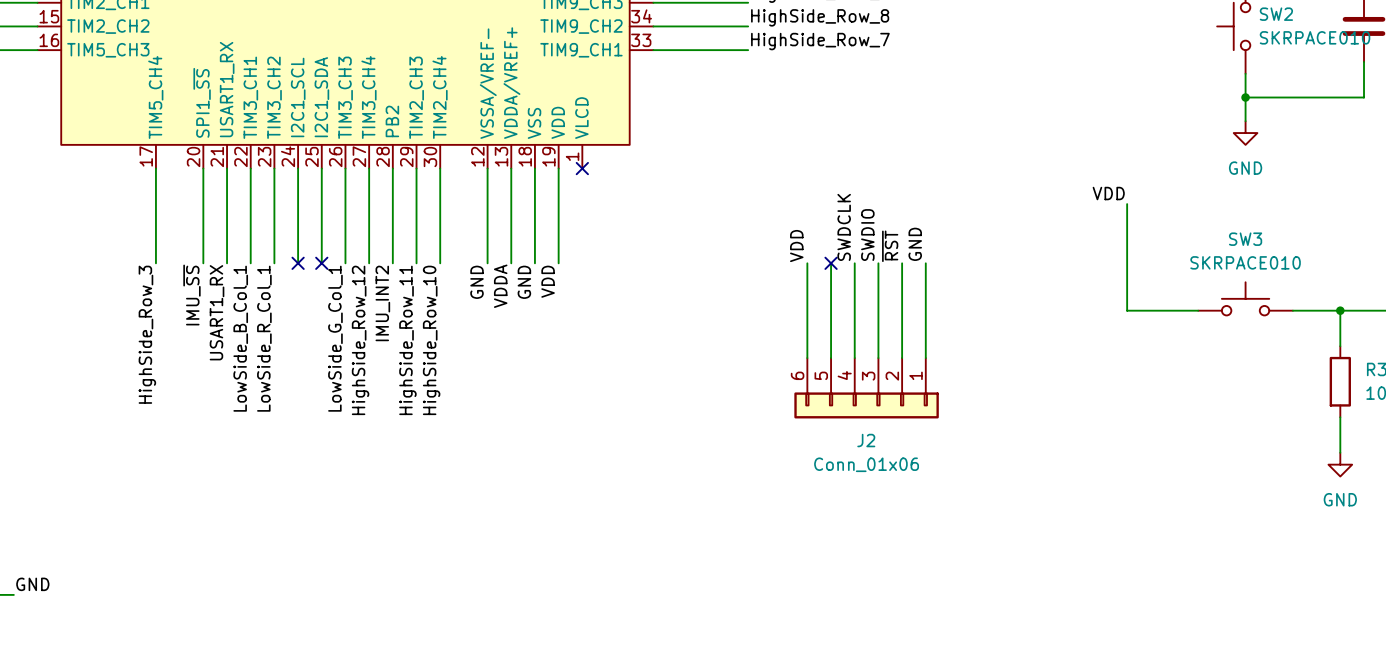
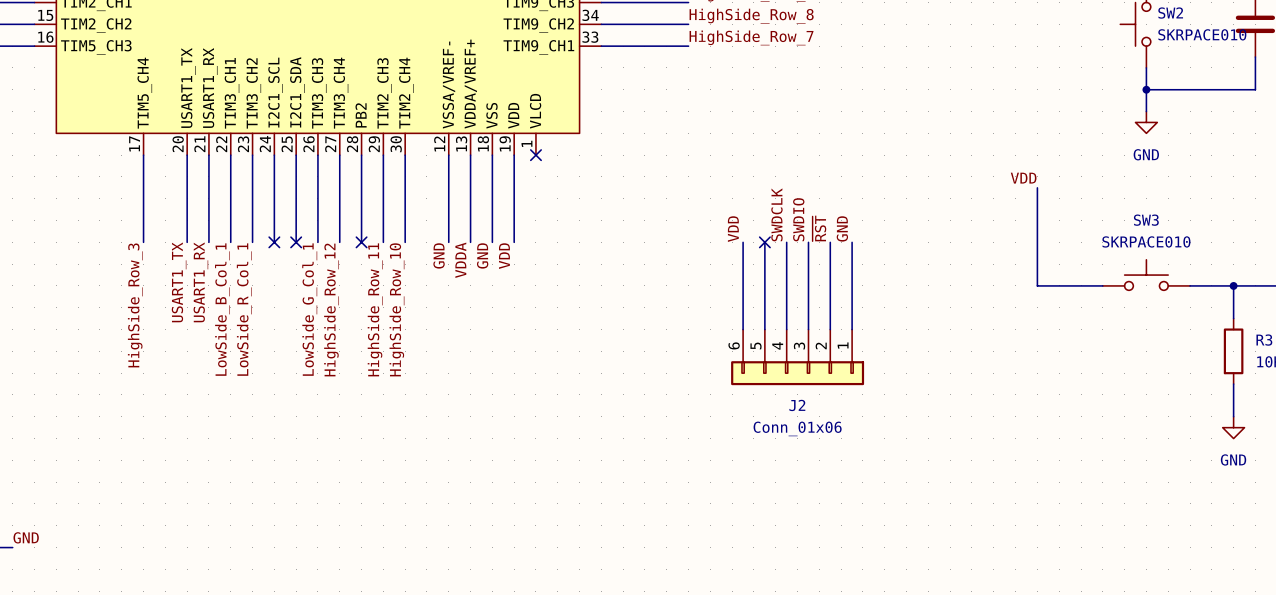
part pin name: SPI1_~{SS} (202, 102) -> USART1_TX (188, 88)
no-connect mark: none -> (361, 242)
label: IMU_~{SS} (191, 295) -> USART1_TX (179, 282)
label: IMU_INT2 (382, 303) -> none

